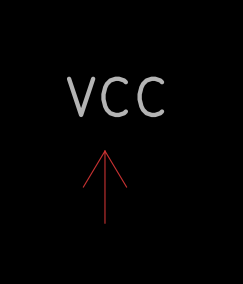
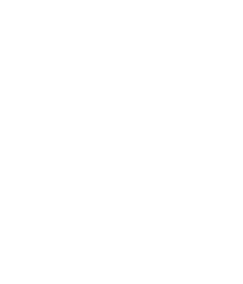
power symbol: VCC (104, 187) -> none

